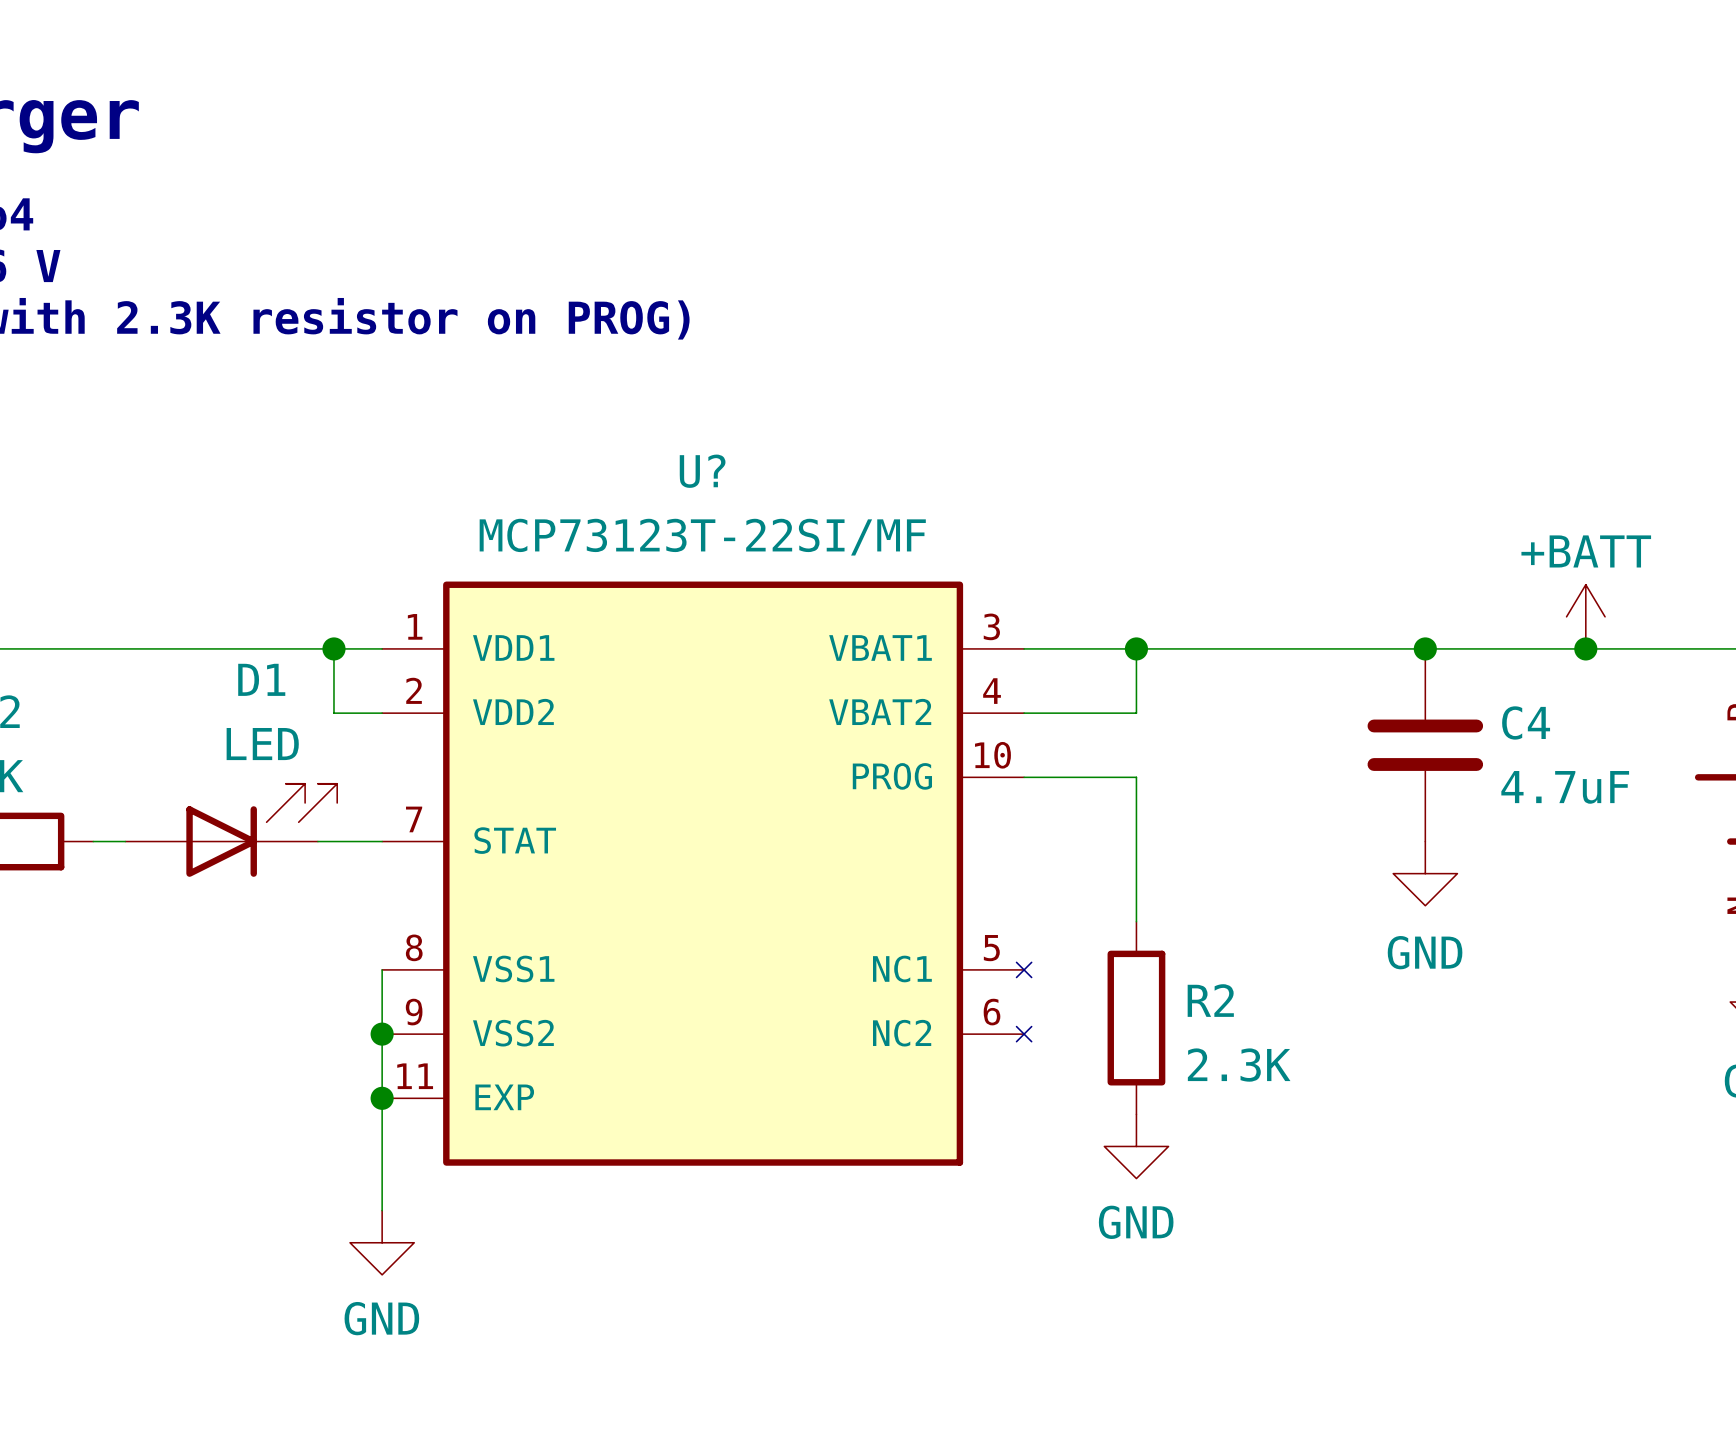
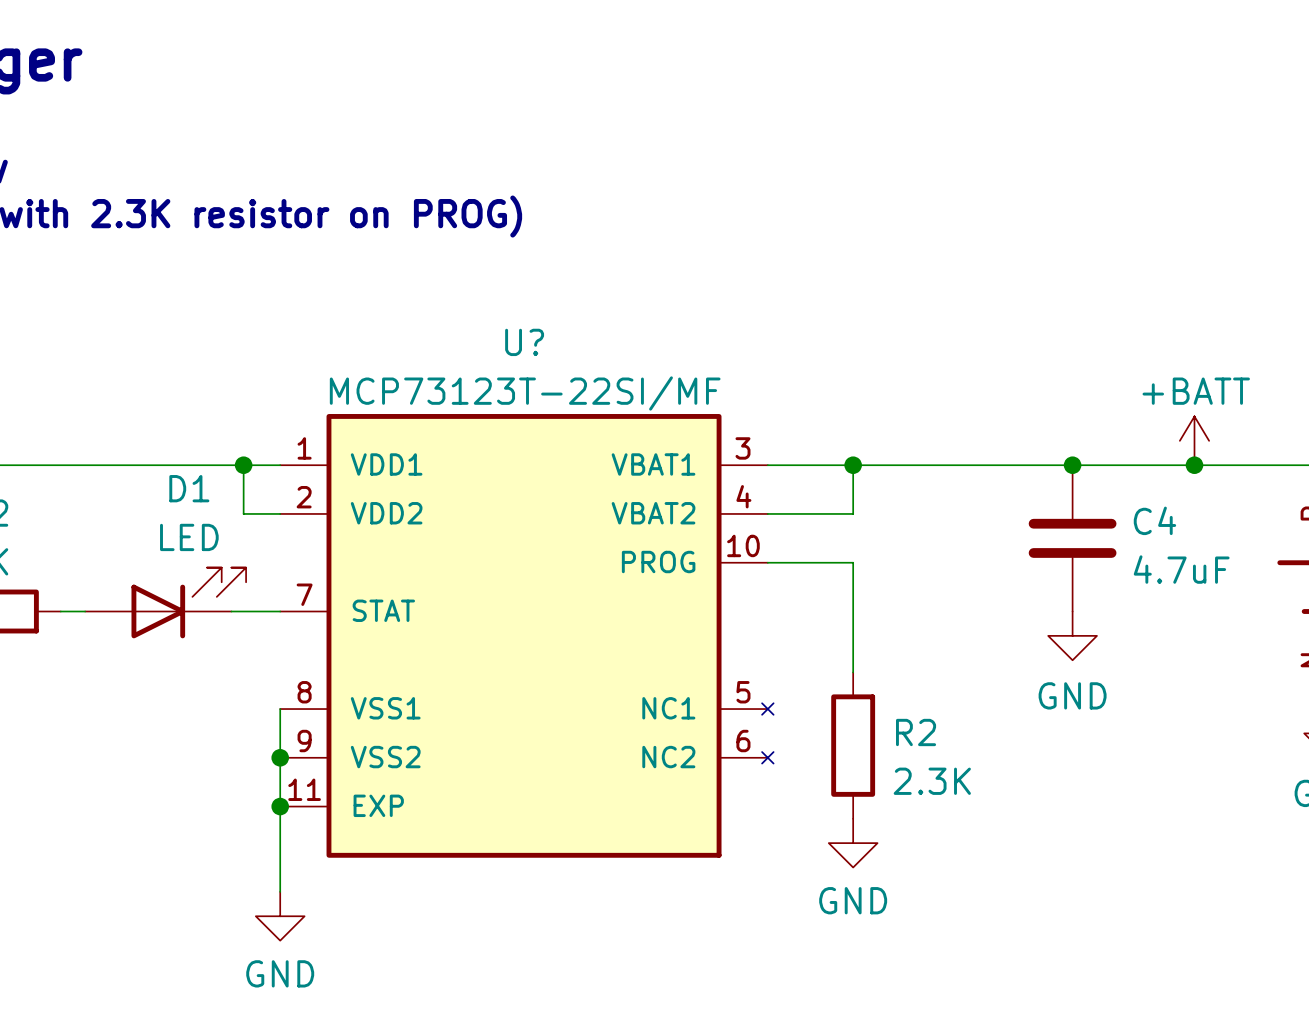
U? name position: U? (702, 471) -> U? (524, 342)
U? value position: MCP73123T-22SI/MF (702, 537) -> MCP73123T-22SI/MF (525, 393)

